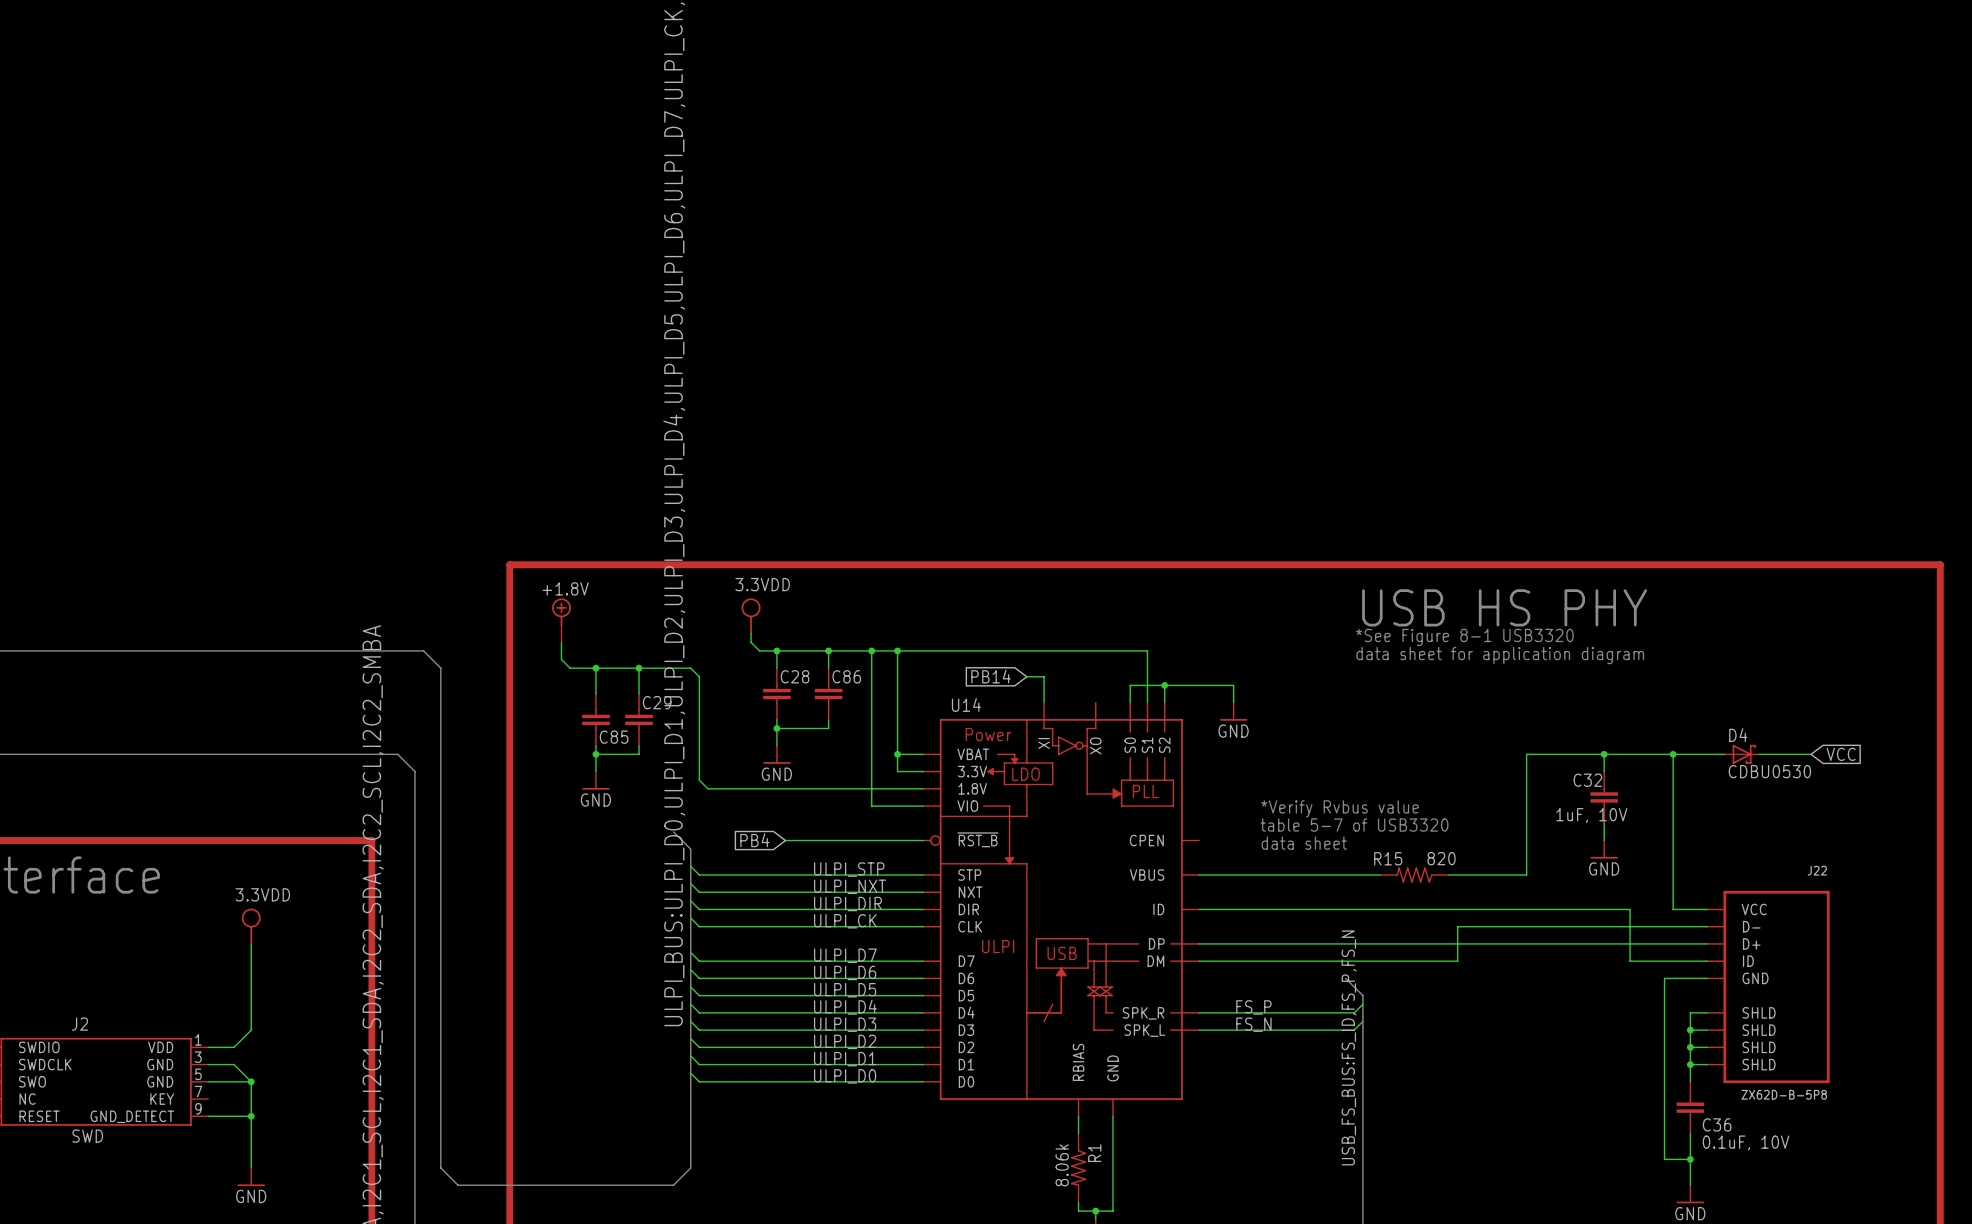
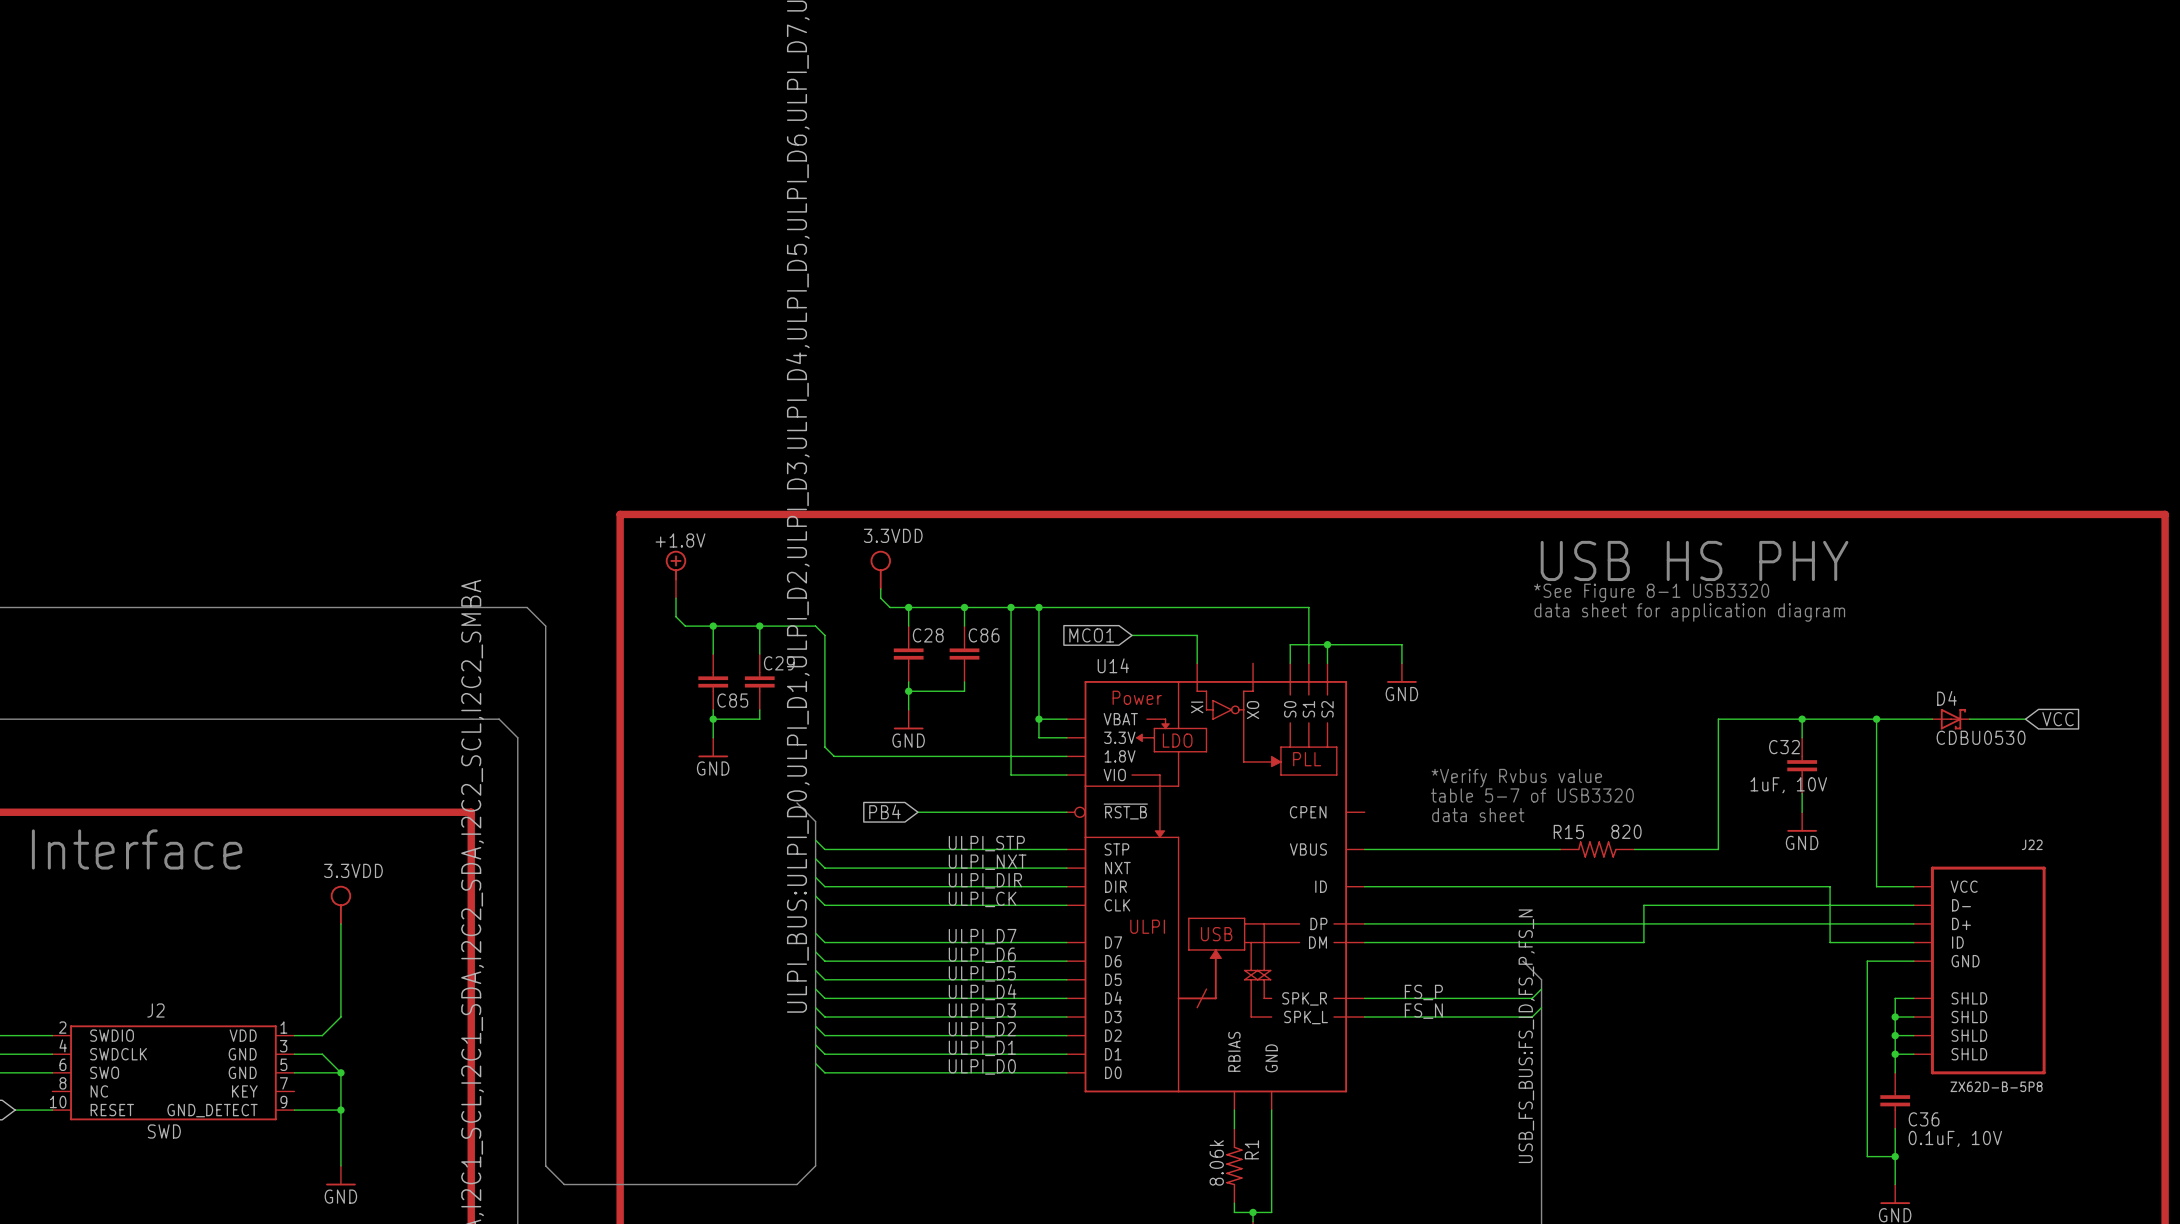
global label: none -> MCO1 (1091, 635)
wire: none -> (1132, 635) (1178, 635)
global label: PB14 (991, 676) -> none

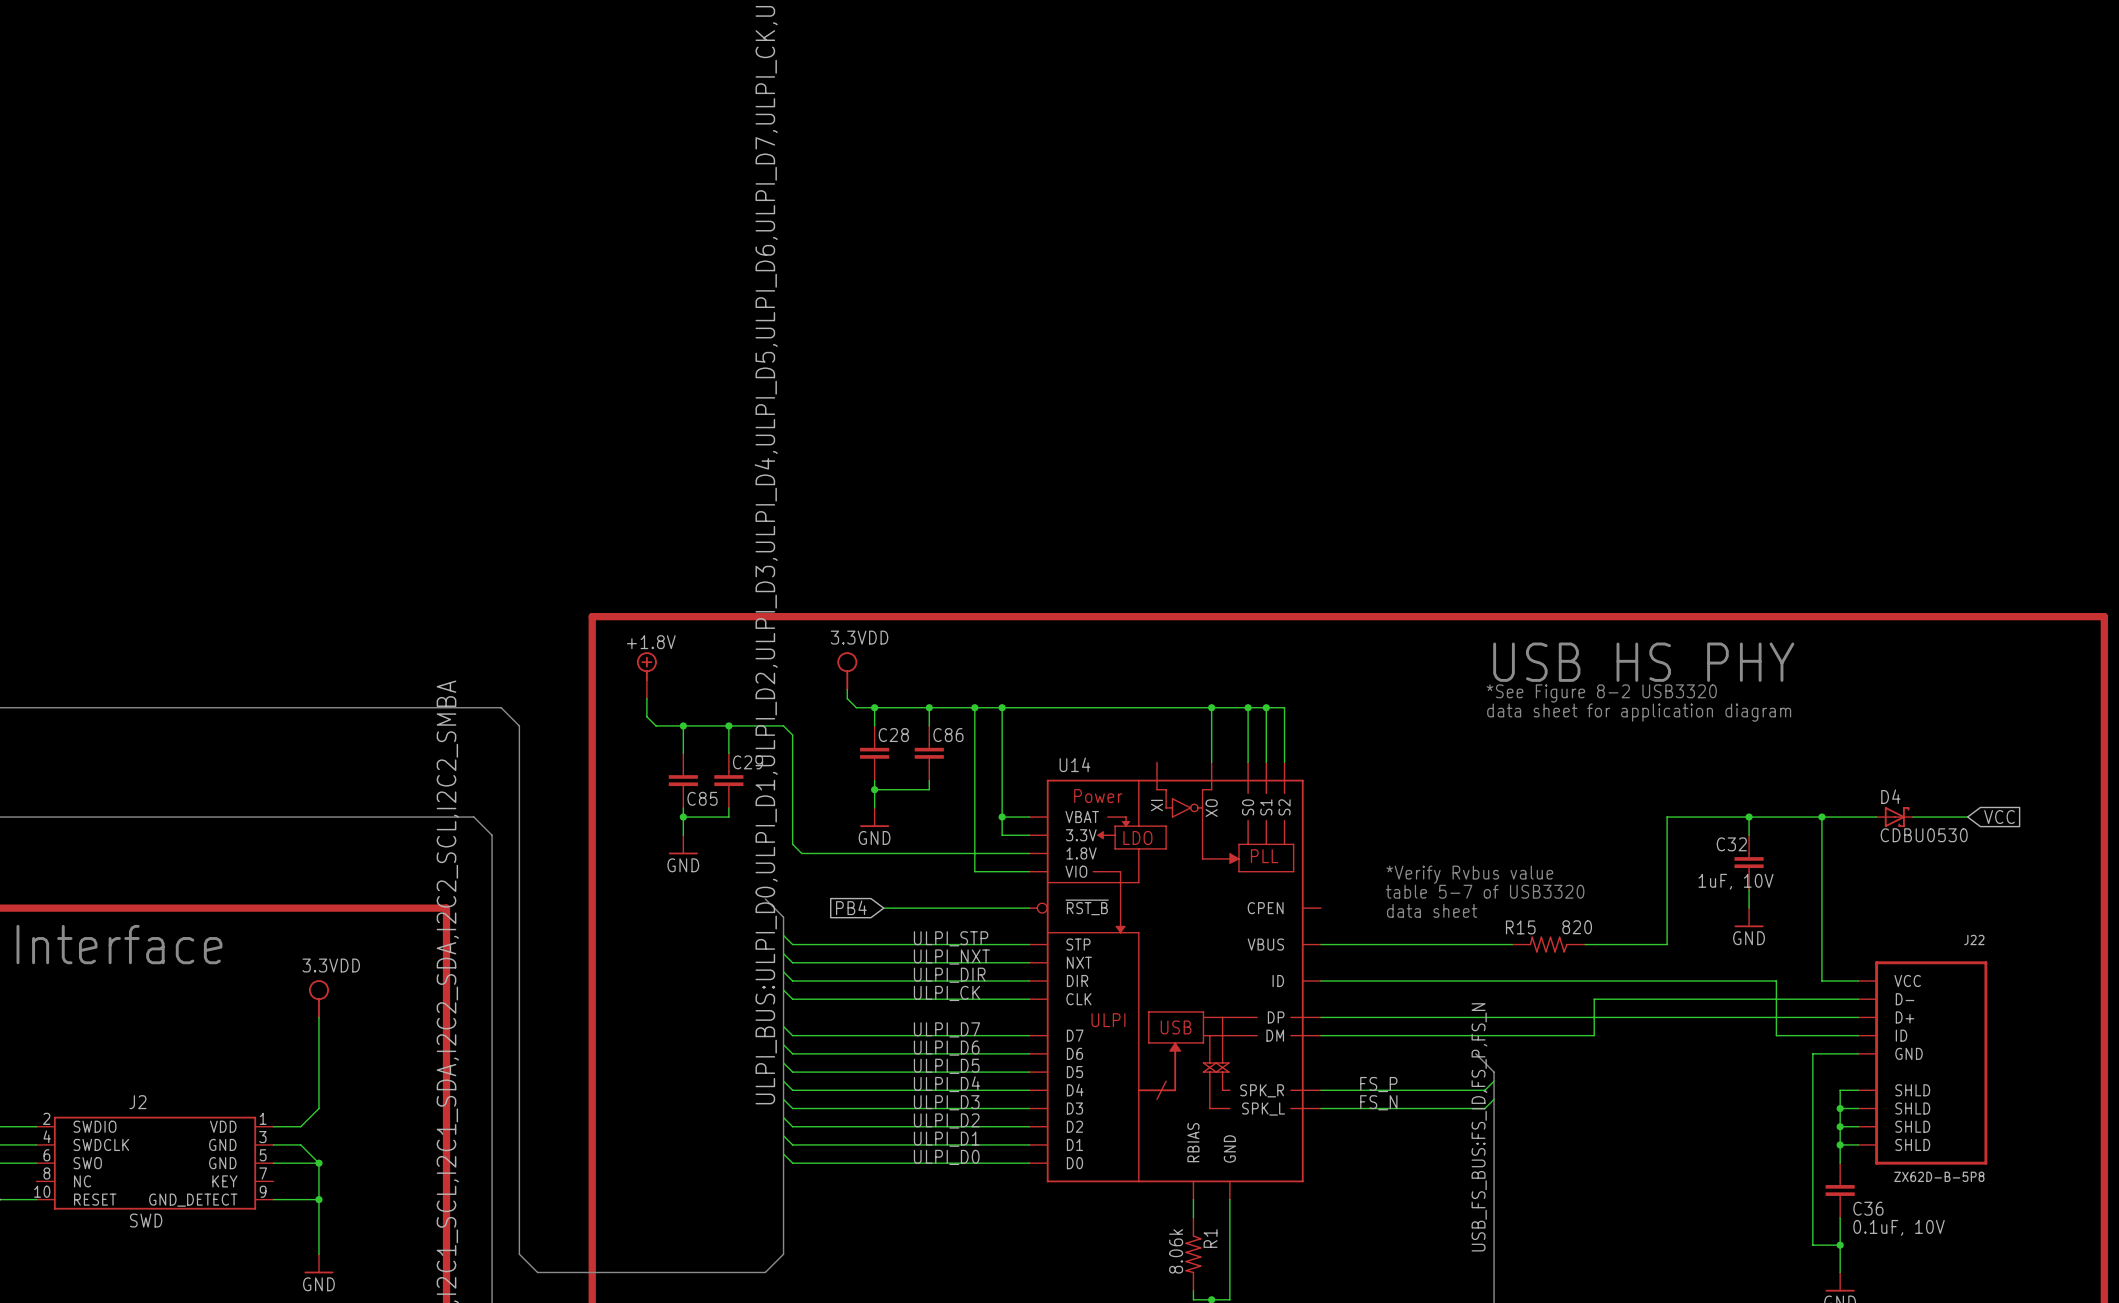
text: *See Figure 8-1 USB3320 (1651, 592) -> *See Figure 8-2 USB3320 (1601, 693)
wire: none -> (1211, 707) (1211, 762)
junction: none -> (1211, 707)
junction: none -> (1248, 707)
wire: none -> (1266, 707) (1284, 707) (1284, 744)
junction: none -> (1266, 707)
global label: MCO1 (1091, 635) -> none
wire: (1132, 635) (1197, 635) (1197, 663) -> none
wire: (1290, 644) (1401, 644) (1401, 663) -> (1248, 744) (1248, 707)
junction: (1327, 644) -> none
power symbol: GND (1401, 673) -> none

